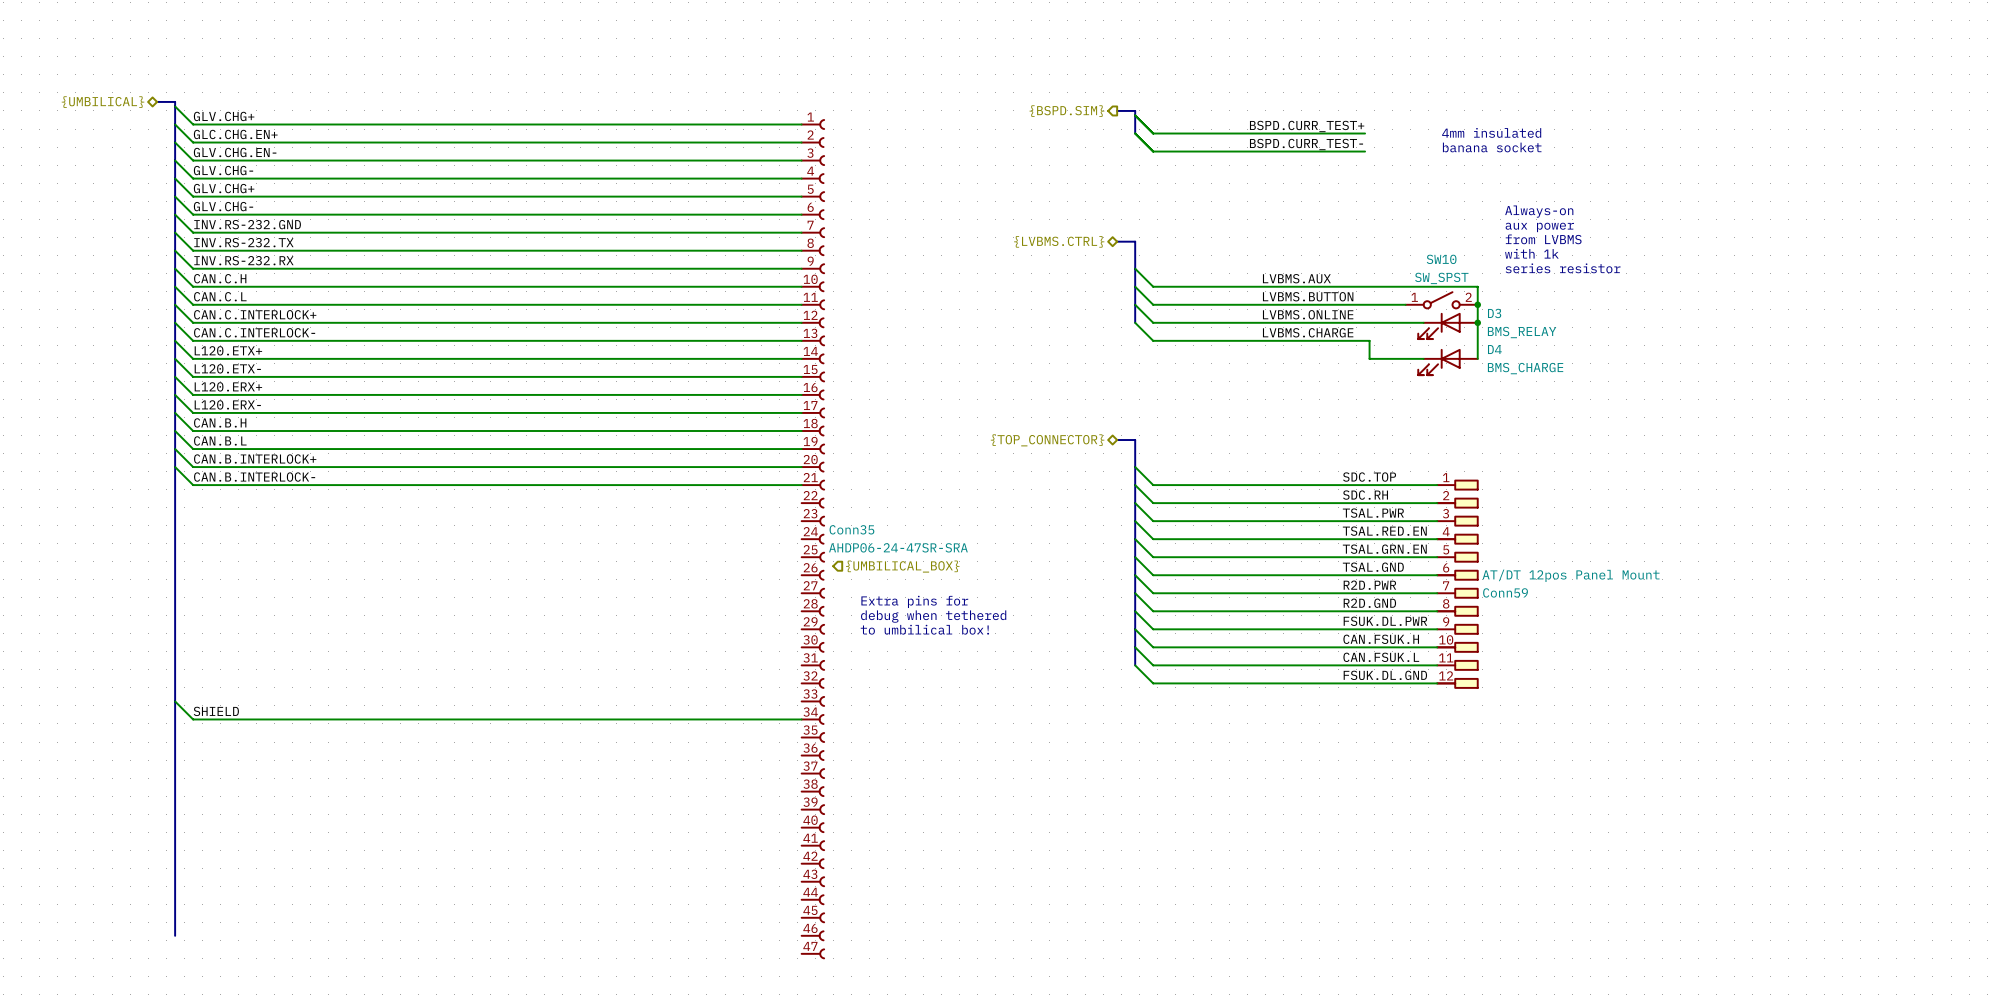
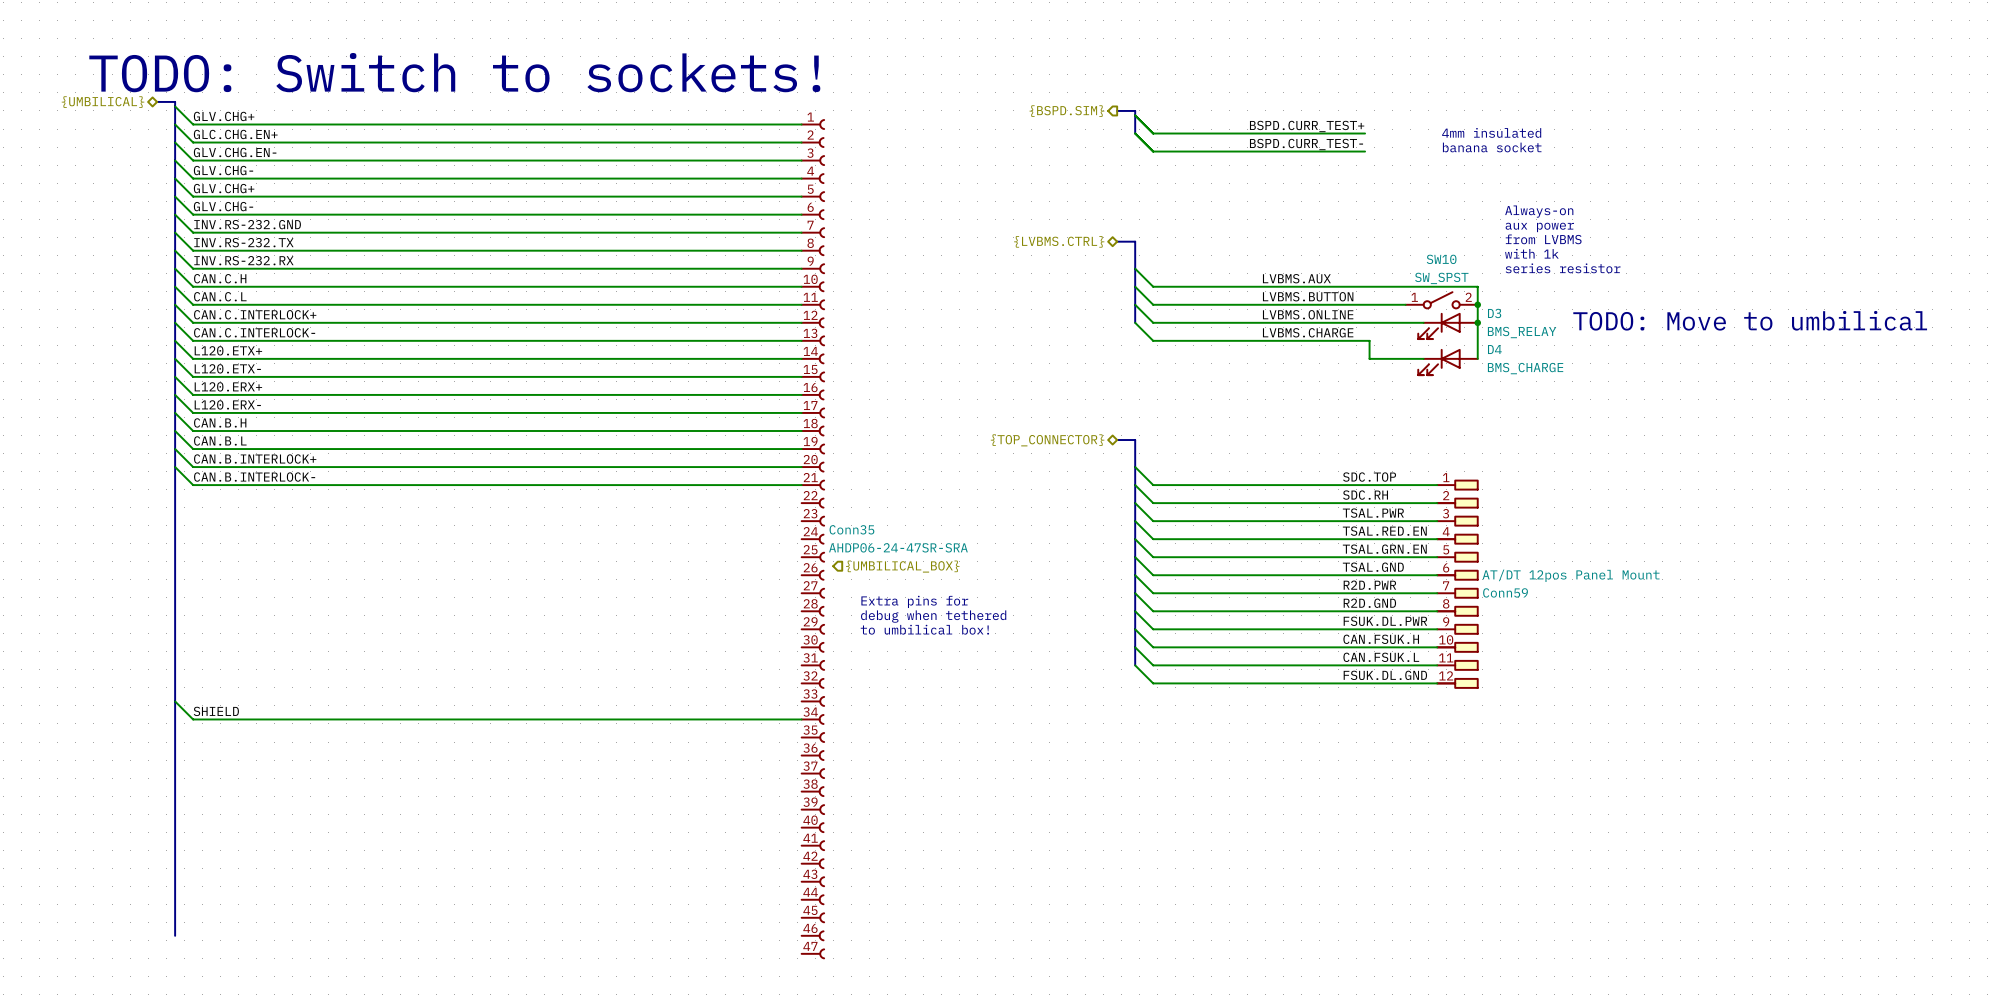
text: none -> TODO: Switch to sockets! (454, 72)
text: none -> TODO: Move to umbilical (1750, 320)

